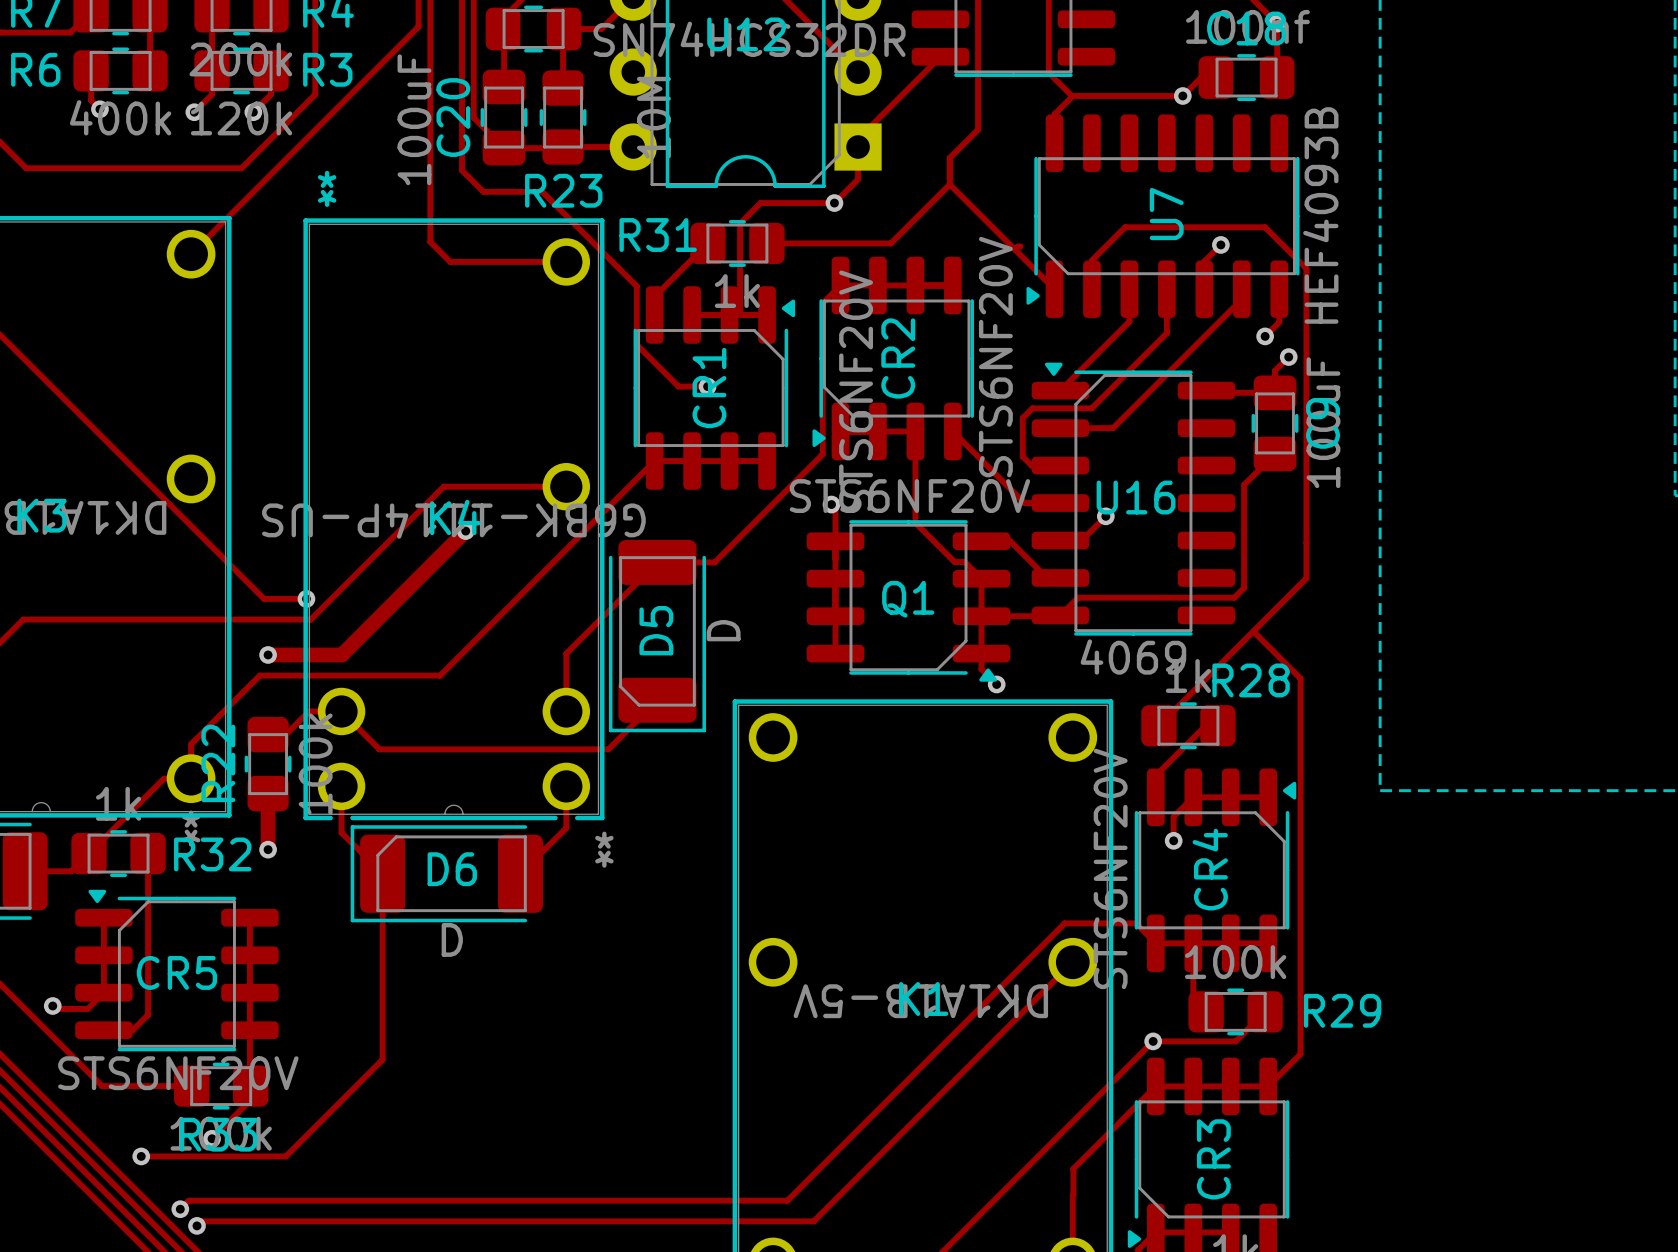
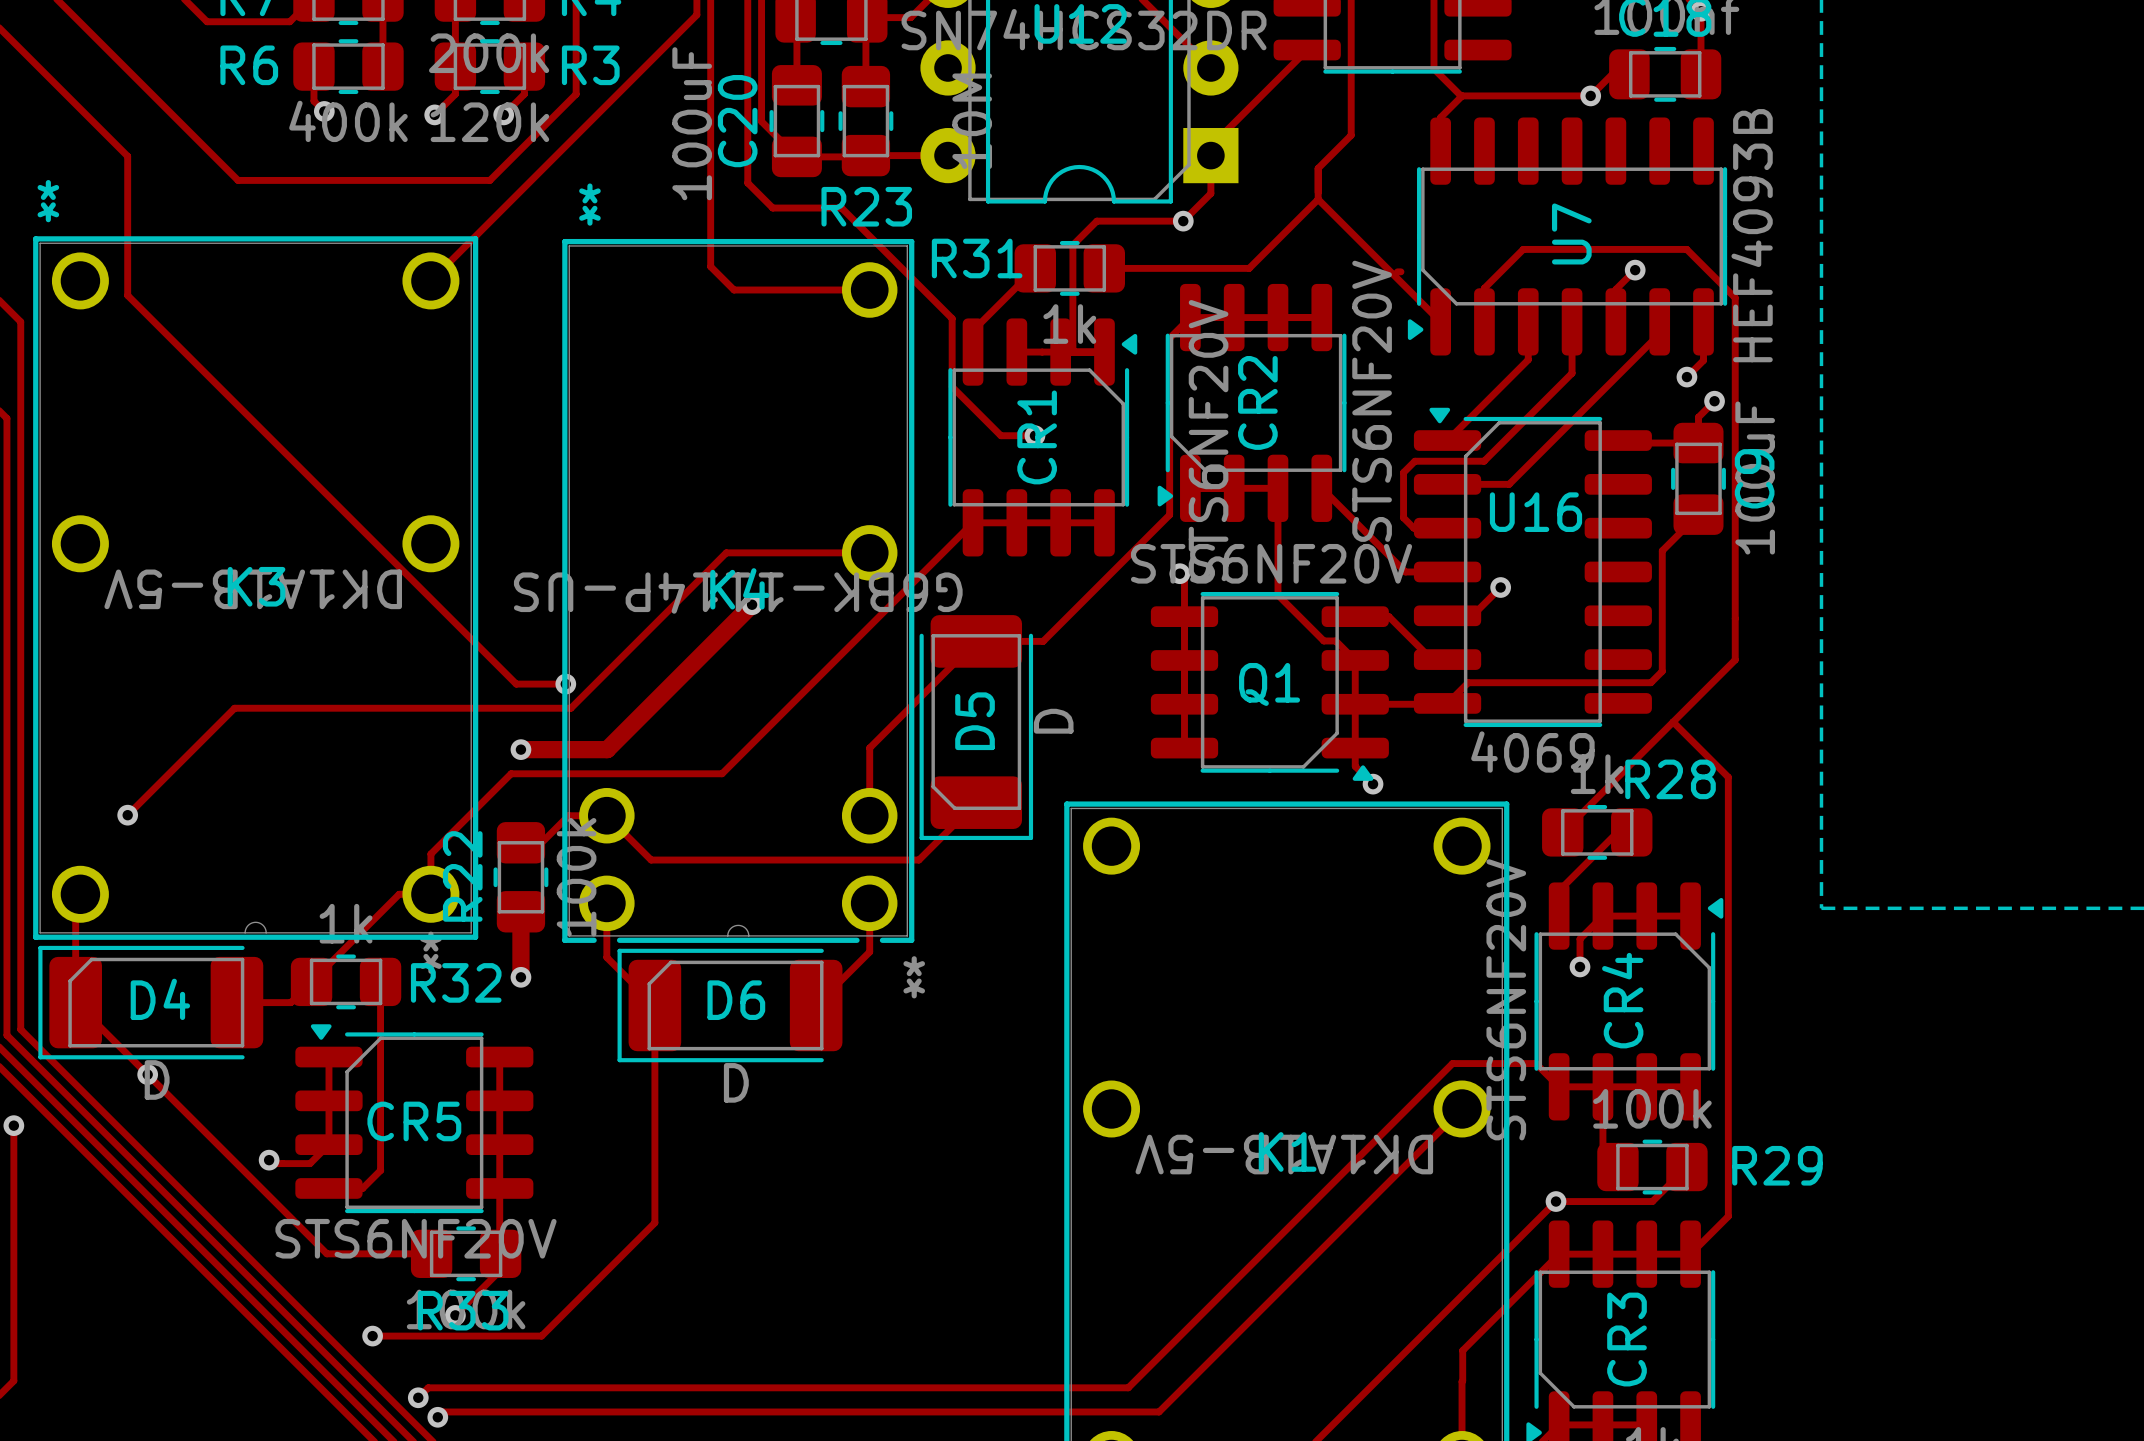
U16 name position: U16 (1136, 497) -> U16 (1535, 512)

